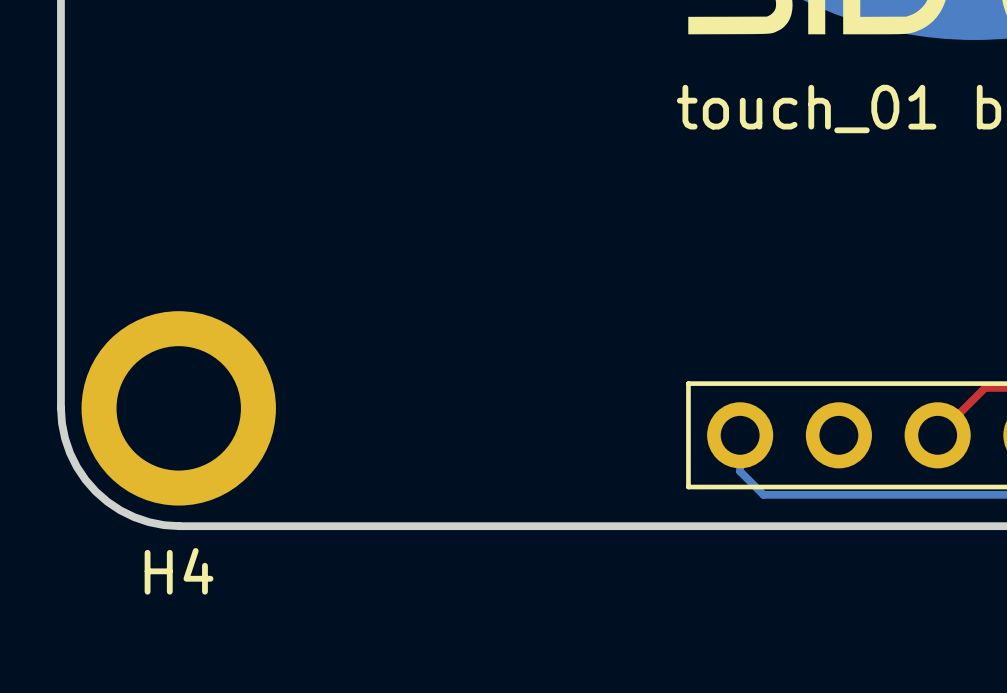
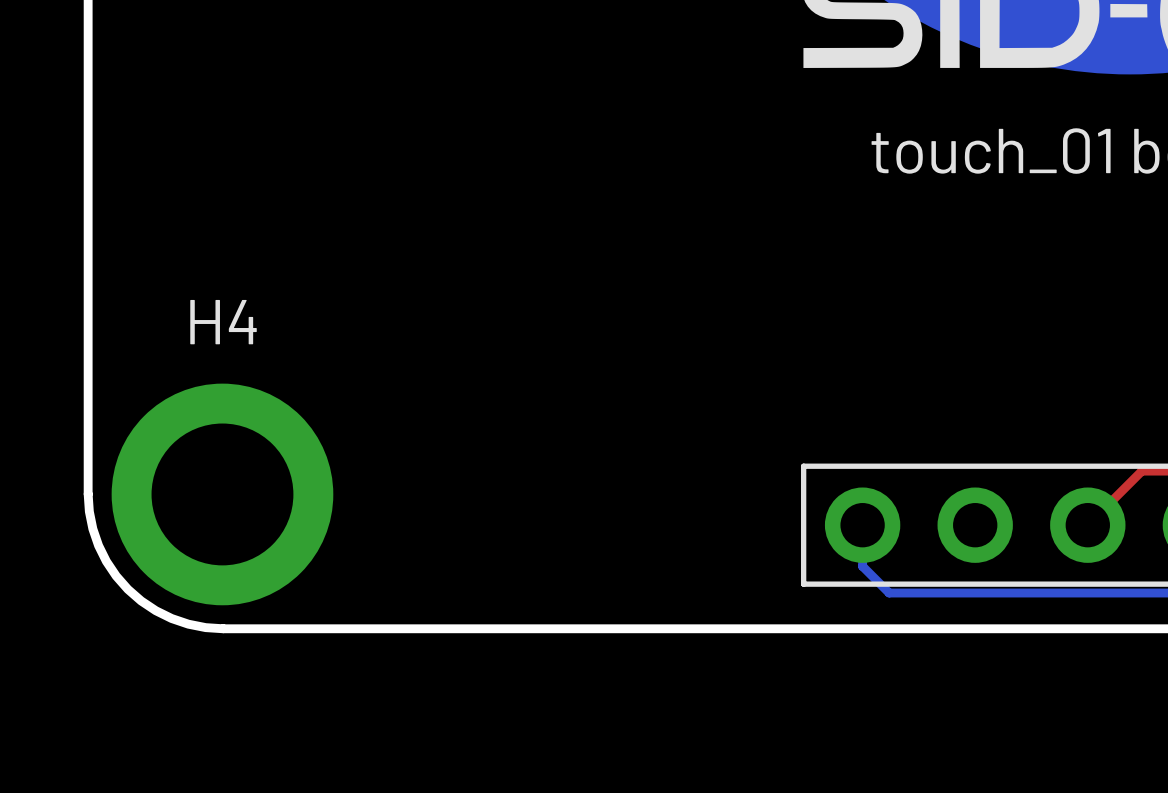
H4 name position: H4 (179, 571) -> H4 (223, 322)

